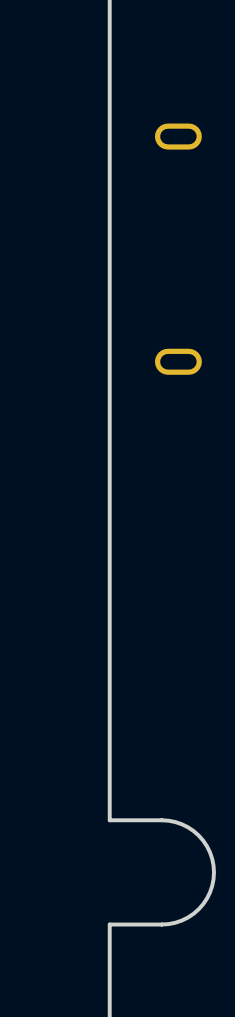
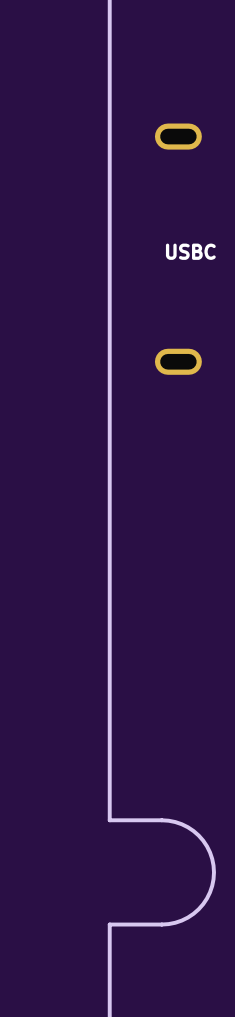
text: none -> USBC (190, 251)

